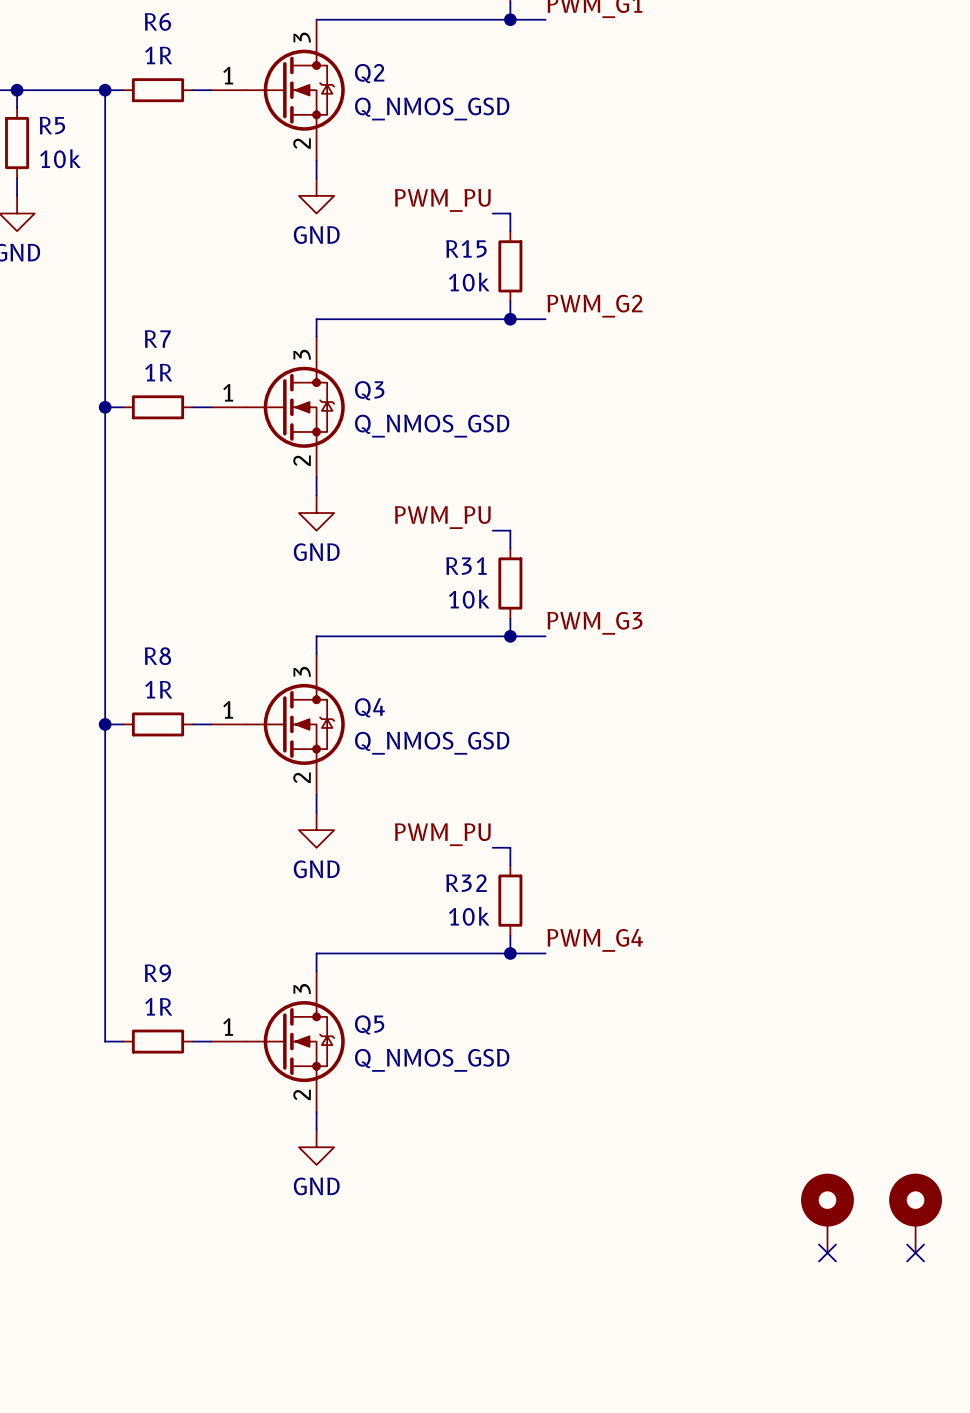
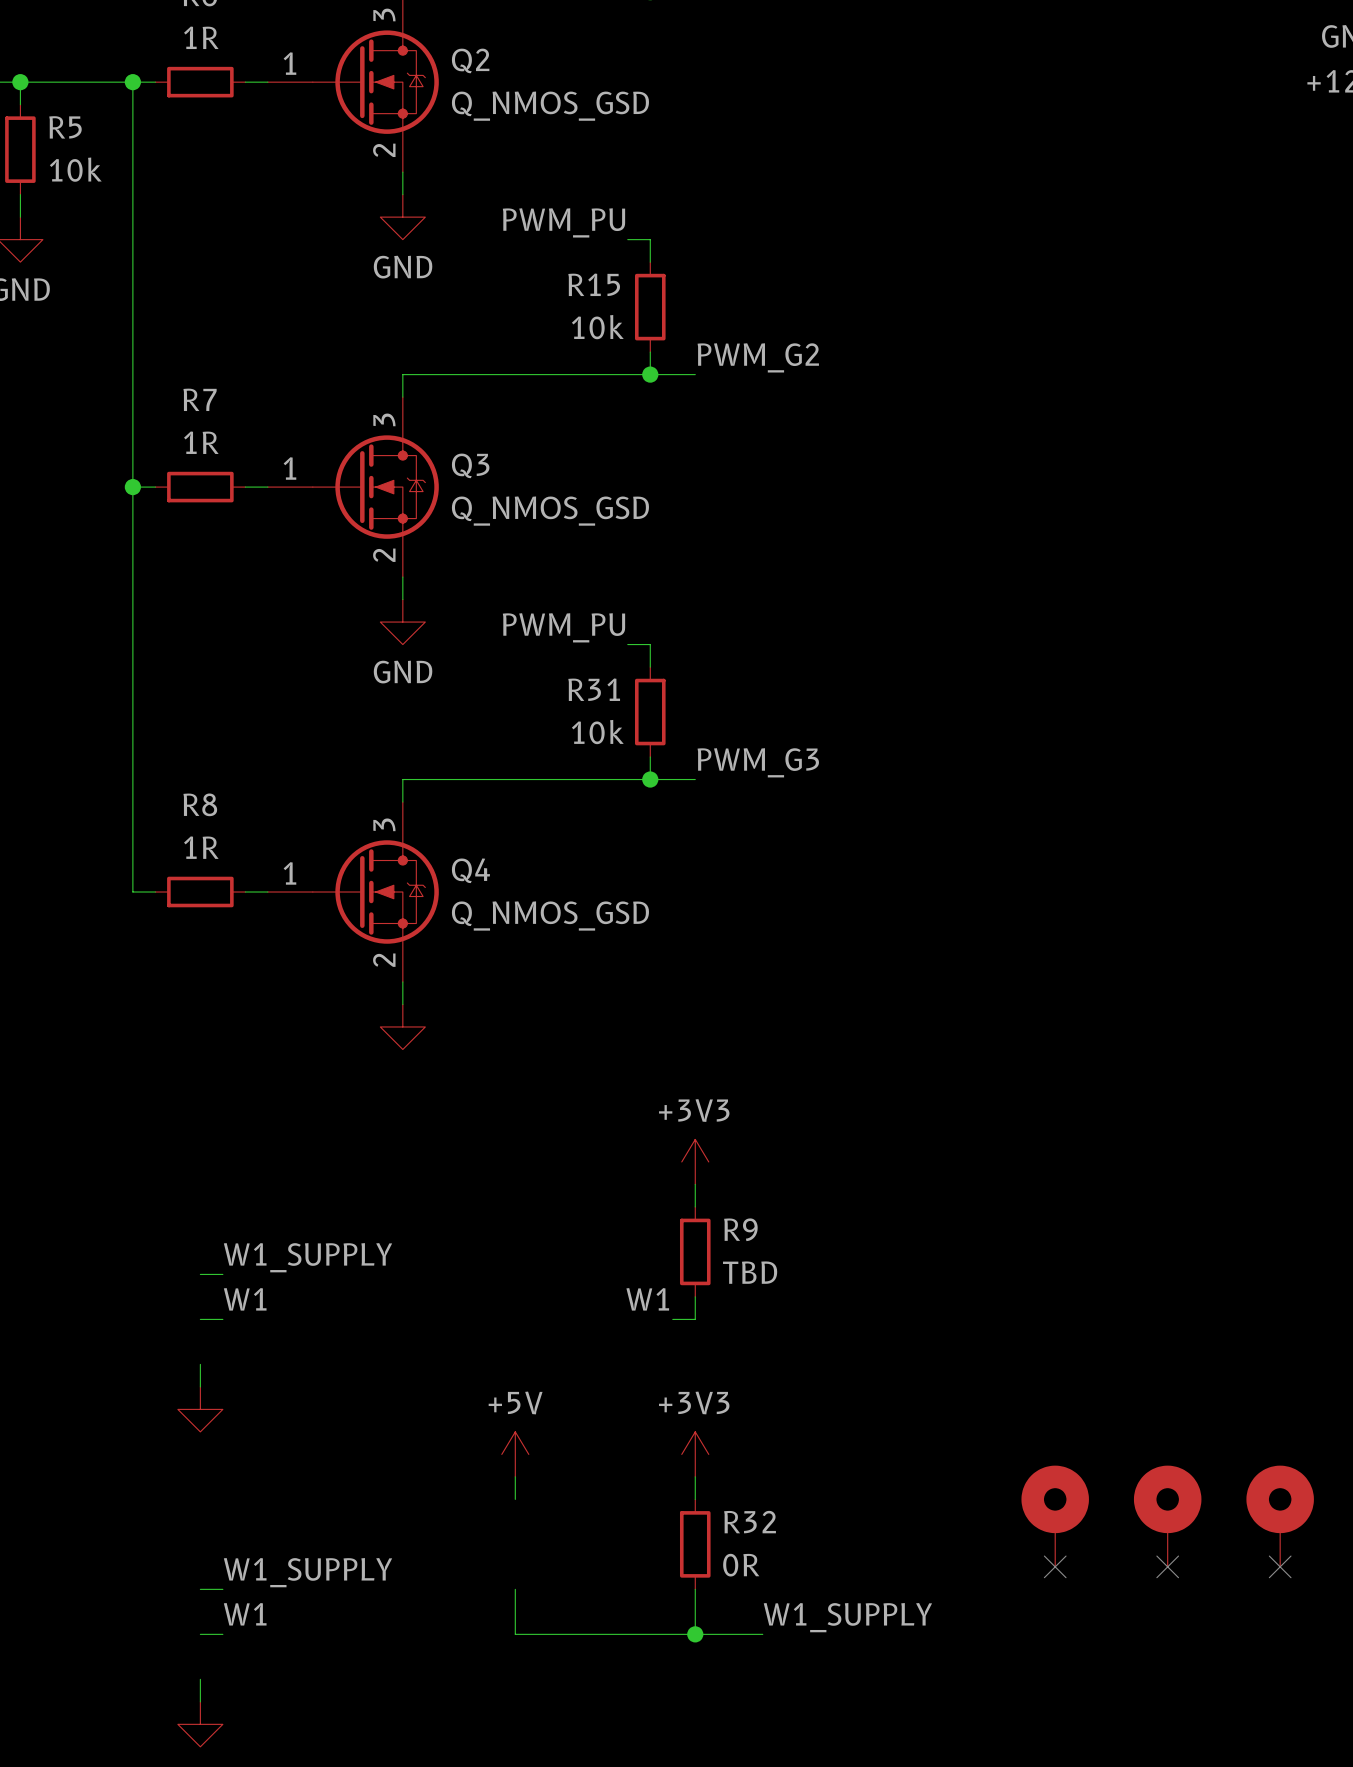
wire: (105, 724) (105, 1041) (122, 1041) -> none
junction: (105, 724) -> none
label: PWM_PU (442, 834) -> none
wire: (492, 847) (510, 847) (510, 865) -> none
power symbol text: GND (316, 869) -> none
R32 name position: R32 (466, 883) -> R32 (750, 1522)
R32 position: (510, 900) -> (695, 1544)
R32 value: 10k (469, 916) -> 0R (741, 1565)
wire: (510, 935) (510, 953) -> (695, 1476) (695, 1499)
power symbol: none -> +3V3 (695, 1161)
label: PWM_G4 (595, 940) -> none
junction: (510, 953) -> none
wire: (545, 953) (316, 953) (316, 971) -> (695, 1184) (695, 1206)
R9 name position: R9 (157, 973) -> R9 (740, 1229)
R9 value: 1R (158, 1006) -> TBD (750, 1272)
label: none -> W1_SUPPLY (308, 1257)
R9 rotation: 0° (158, 1041) -> 90° clockwise (695, 1251)
R9 position: (158, 1041) -> (695, 1251)
wire: (193, 1041) (210, 1041) -> (200, 1274) (222, 1274)
Q5: Q_NMOS_GSD (277, 1041) -> none
wire: none -> (695, 1296) (695, 1319) (672, 1319)
label: none -> W1 (245, 1299)
label: none -> W1 (647, 1299)
wire: none -> (200, 1319) (222, 1319)
wire: none -> (200, 1364) (200, 1386)
wire: (316, 1112) (316, 1129) -> (515, 1476) (515, 1499)
power symbol: none -> (200, 1409)
power symbol: GND (316, 1147) -> none
power symbol: none -> +5V (515, 1454)
power symbol: none -> +3V3 (695, 1454)
label: none -> W1_SUPPLY (308, 1572)
wire: none -> (200, 1589) (222, 1589)
wire: none -> (515, 1589) (515, 1634) (762, 1634)
wire: none -> (695, 1589) (695, 1634)
label: none -> W1 (245, 1614)
label: none -> W1_SUPPLY (847, 1617)
wire: none -> (200, 1634) (222, 1634)
junction: none -> (695, 1634)
wire: none -> (200, 1679) (200, 1701)
power symbol: none -> (200, 1724)

